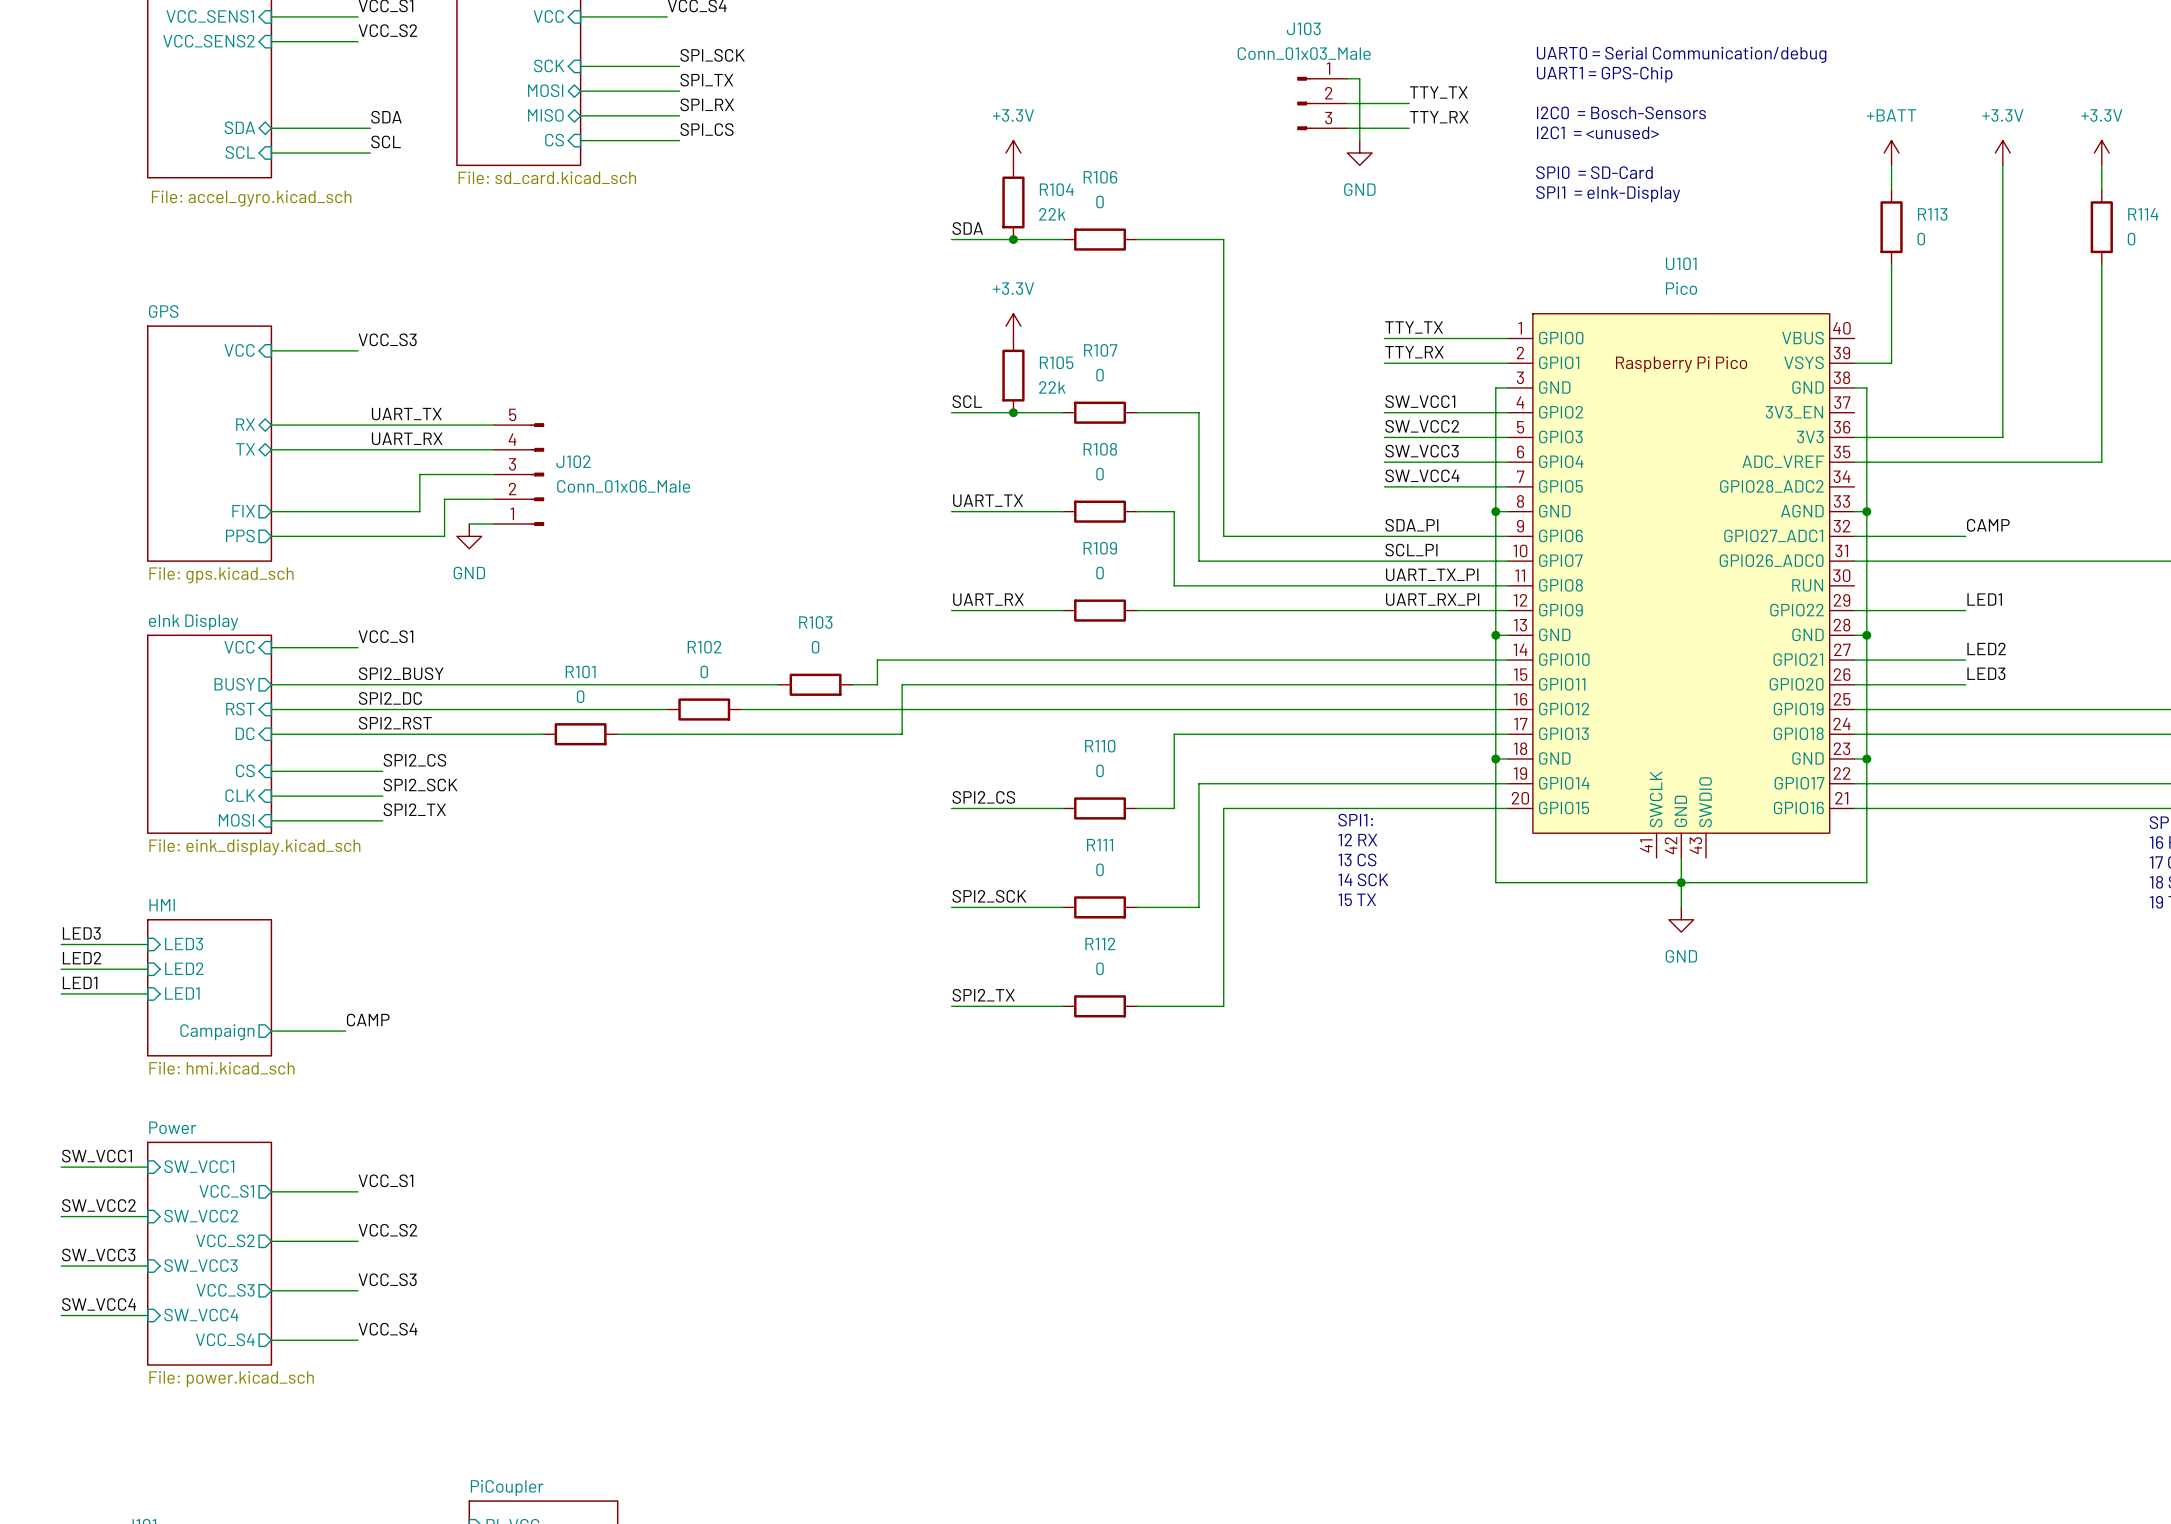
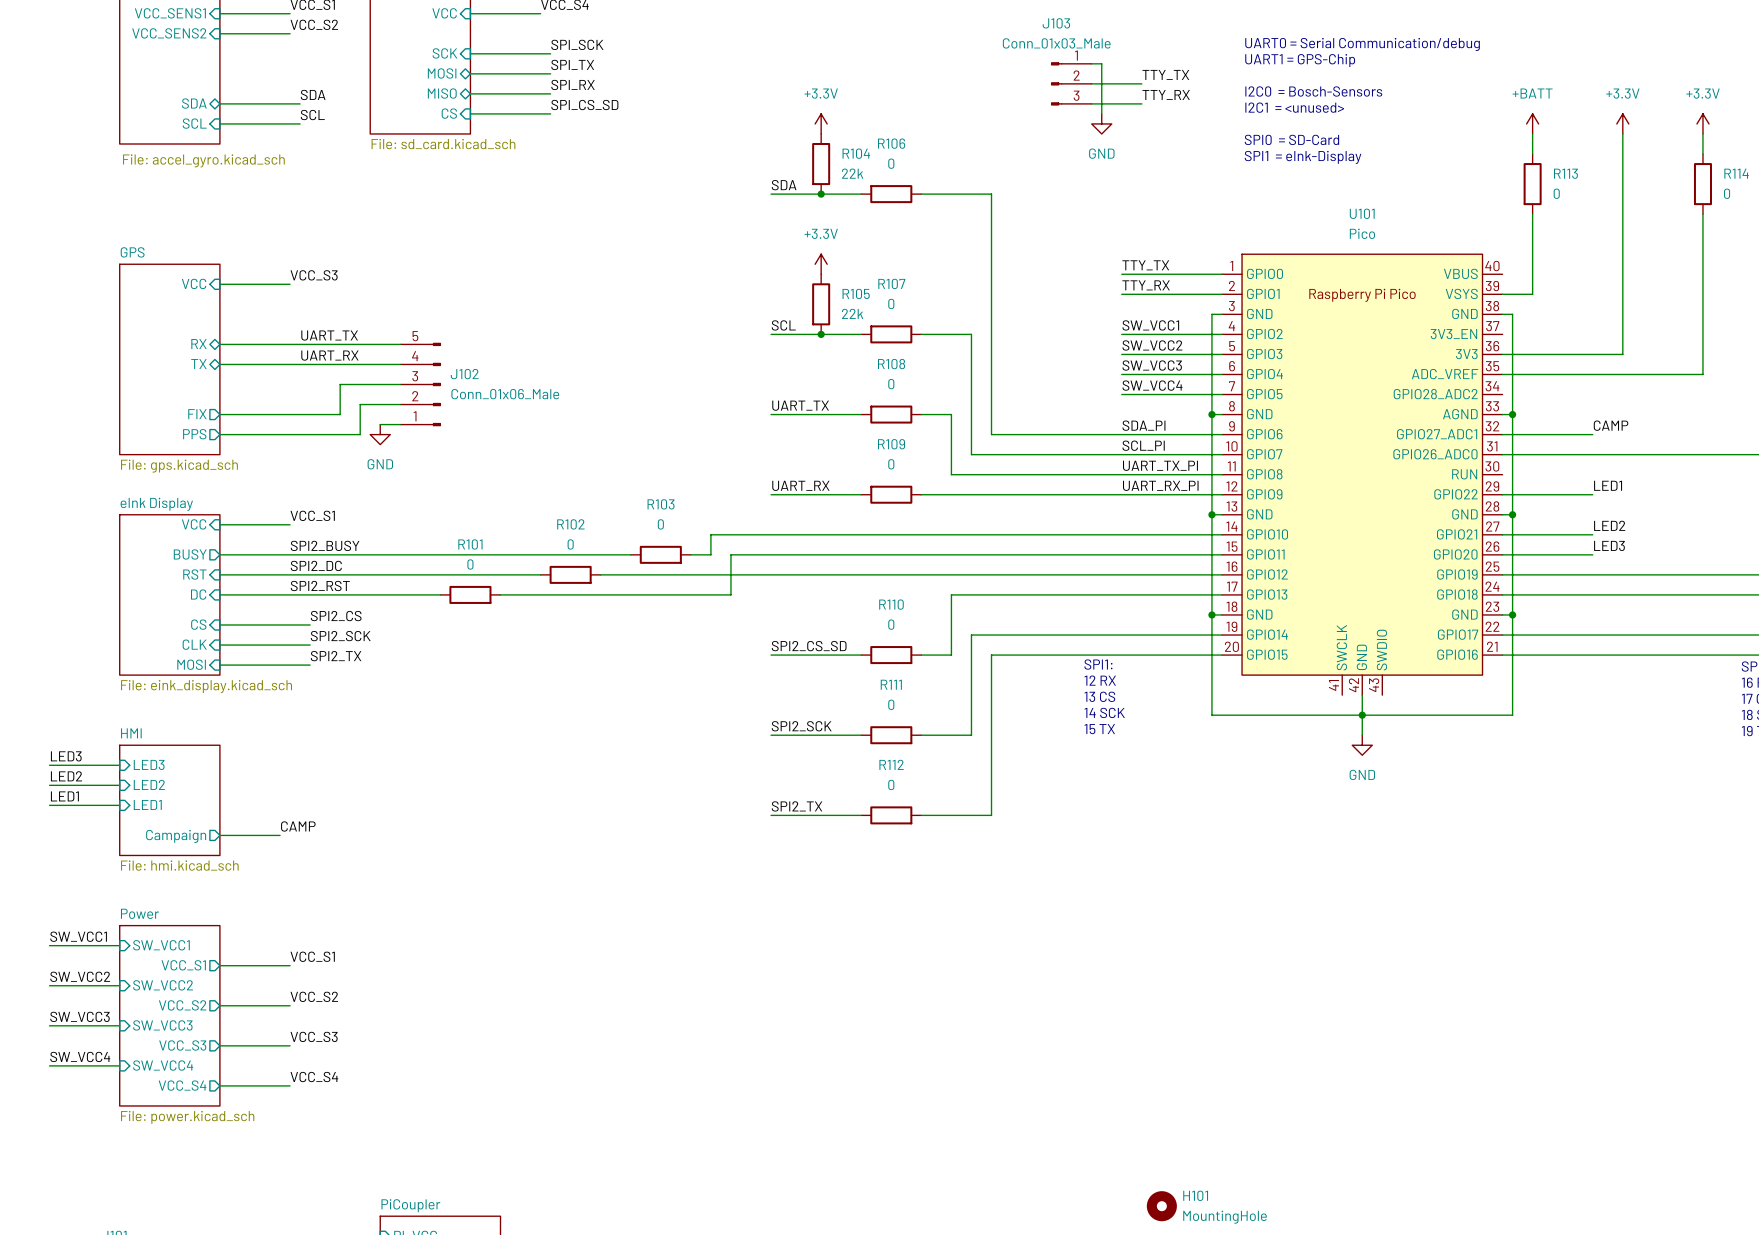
label: SPI_CS (706, 129) -> SPI_CS_SD (584, 105)
label: SPI2_CS (983, 797) -> SPI2_CS_SD (809, 646)
H101: none -> MountingHole (1161, 1206)

